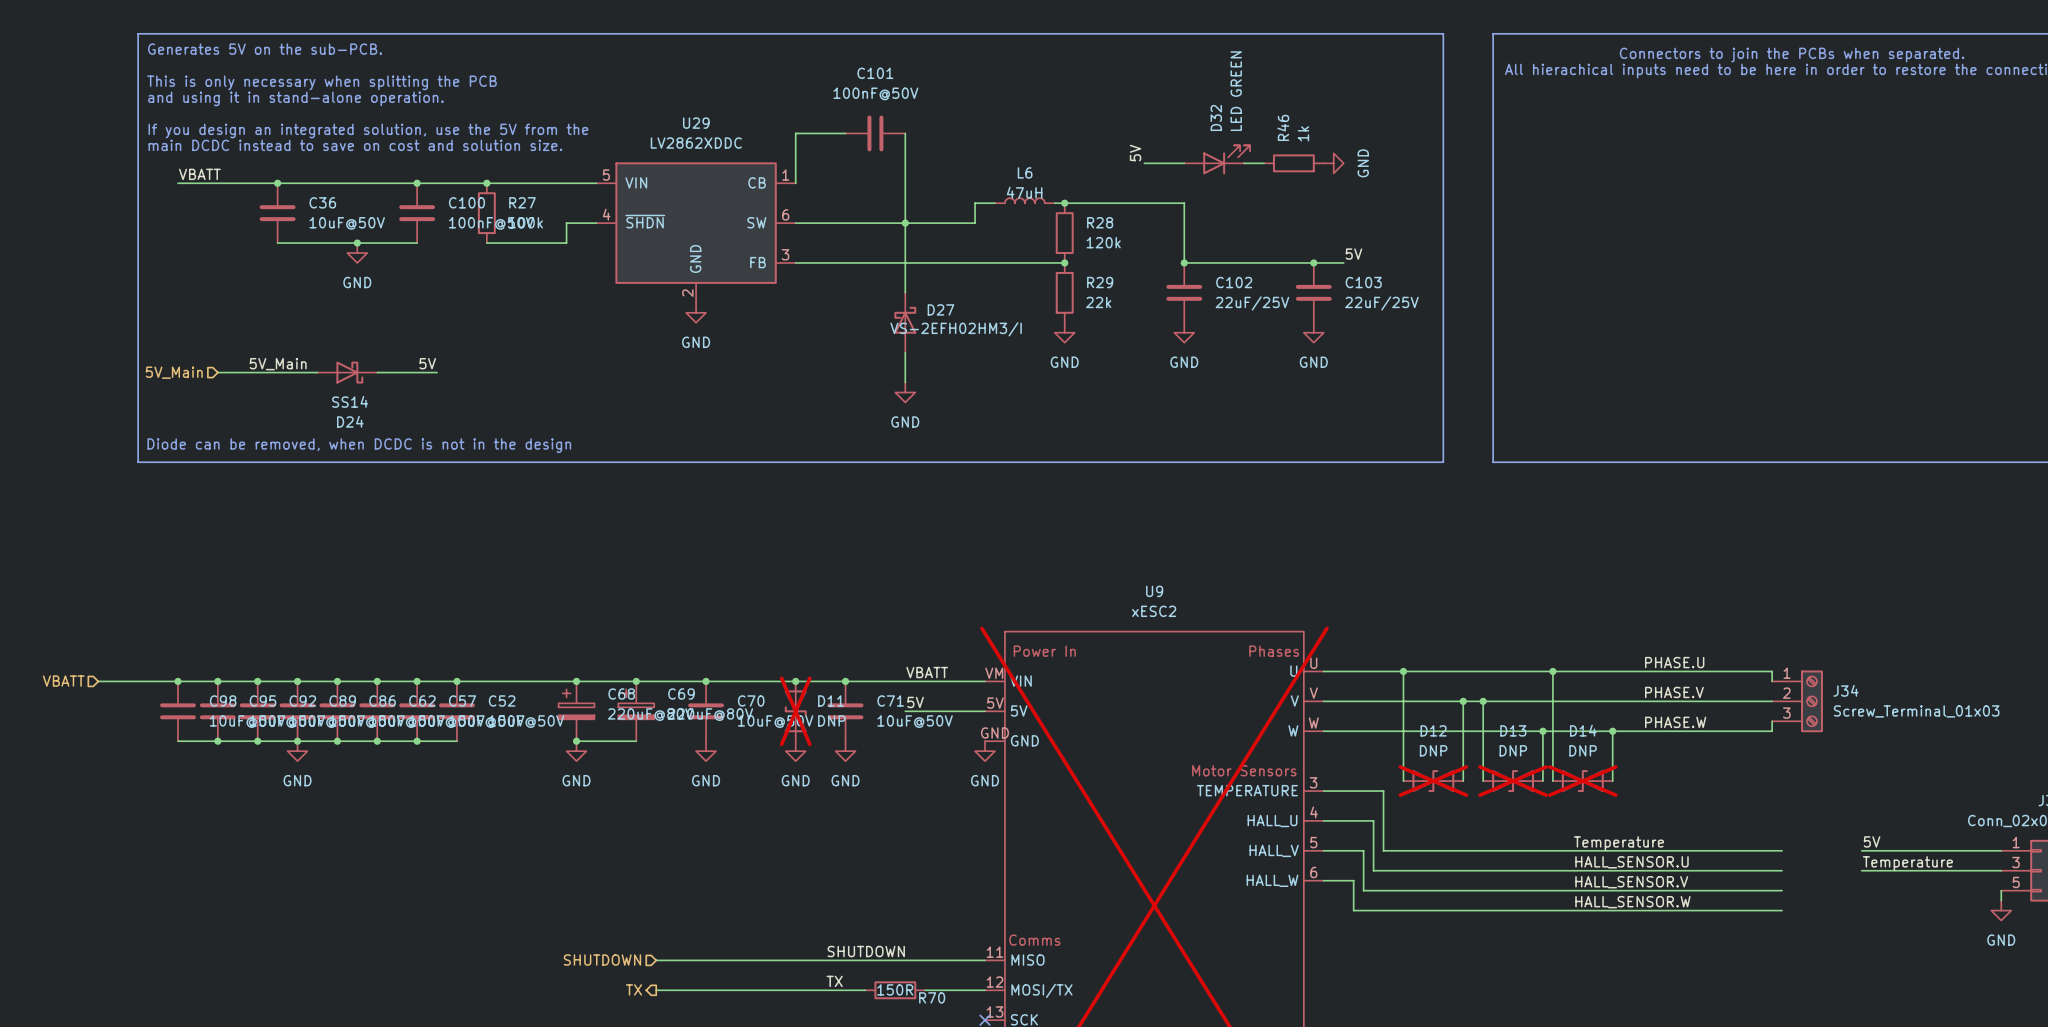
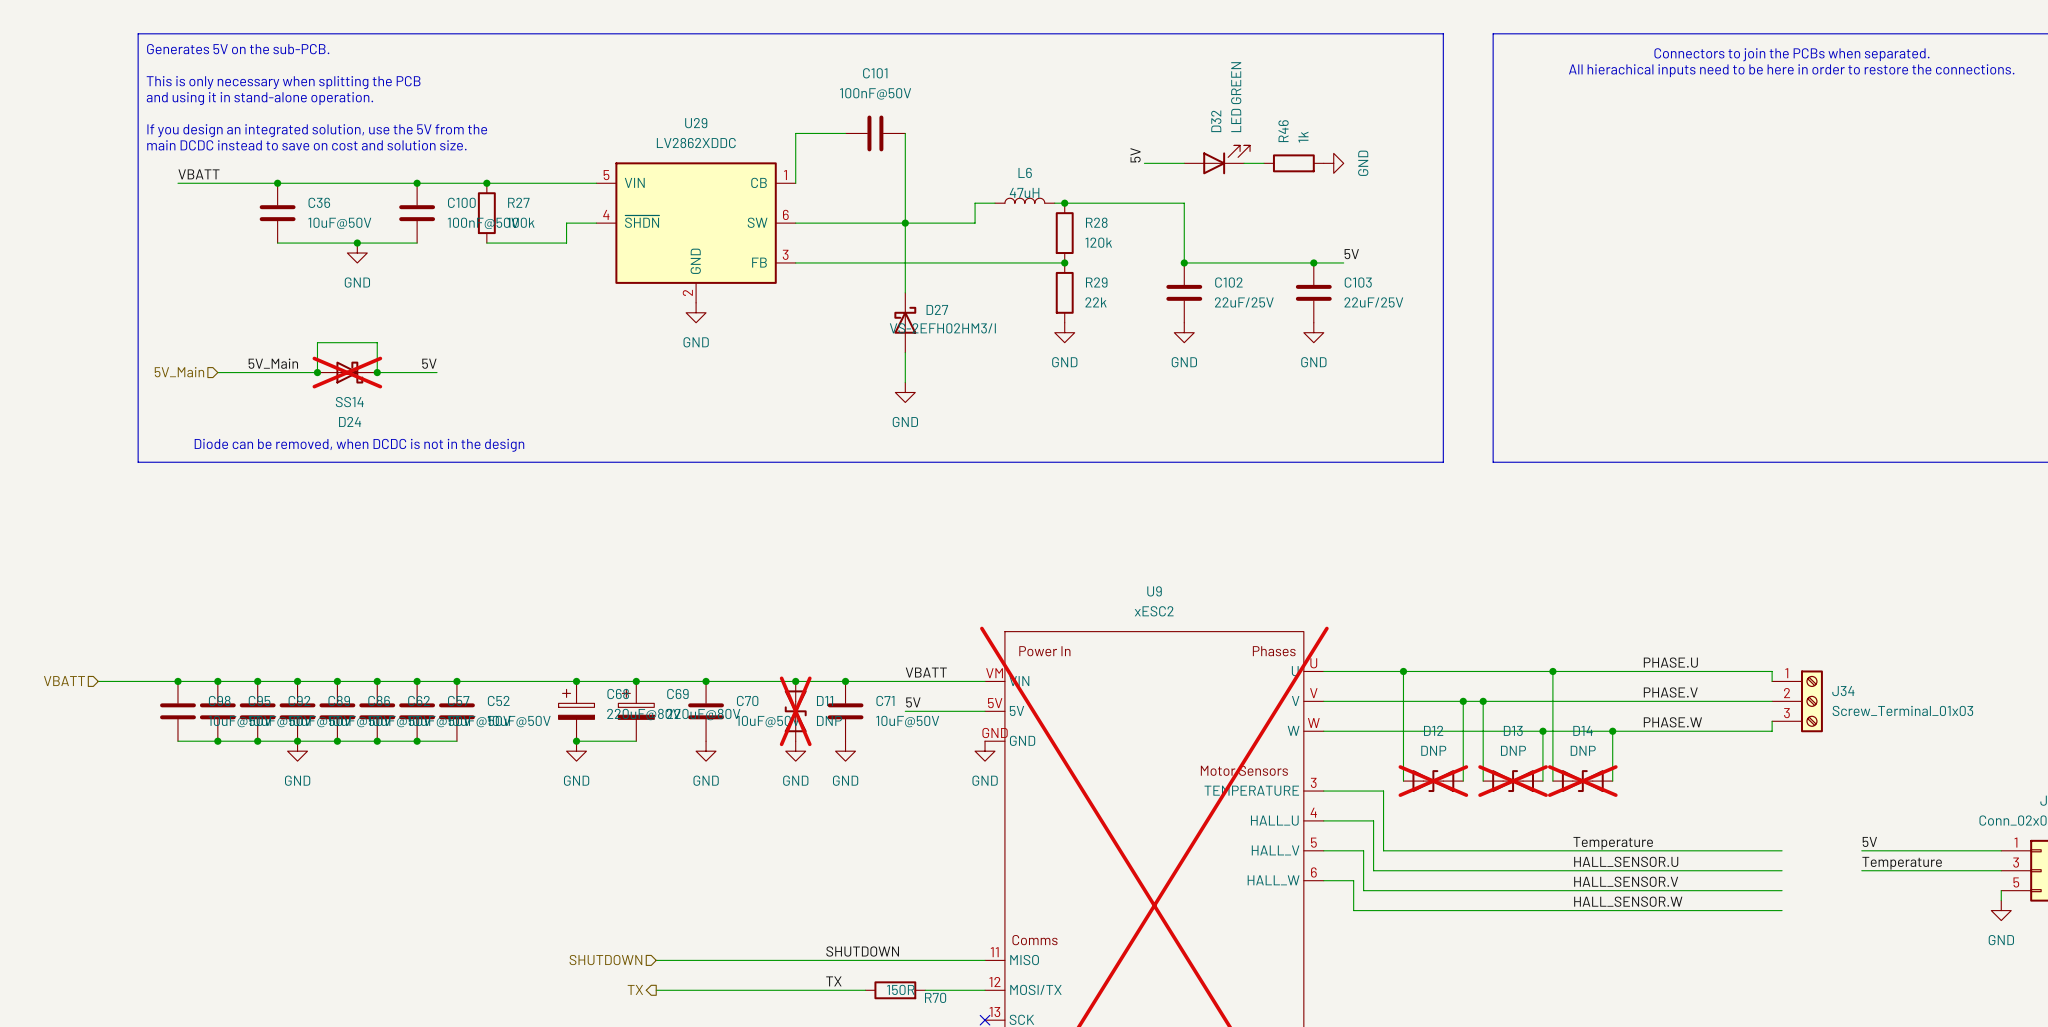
wire: none -> (317, 372) (317, 342) (377, 342) (377, 372)
junction: none -> (317, 372)
D24 do-not-place cross: none -> (347, 372)
junction: none -> (377, 372)

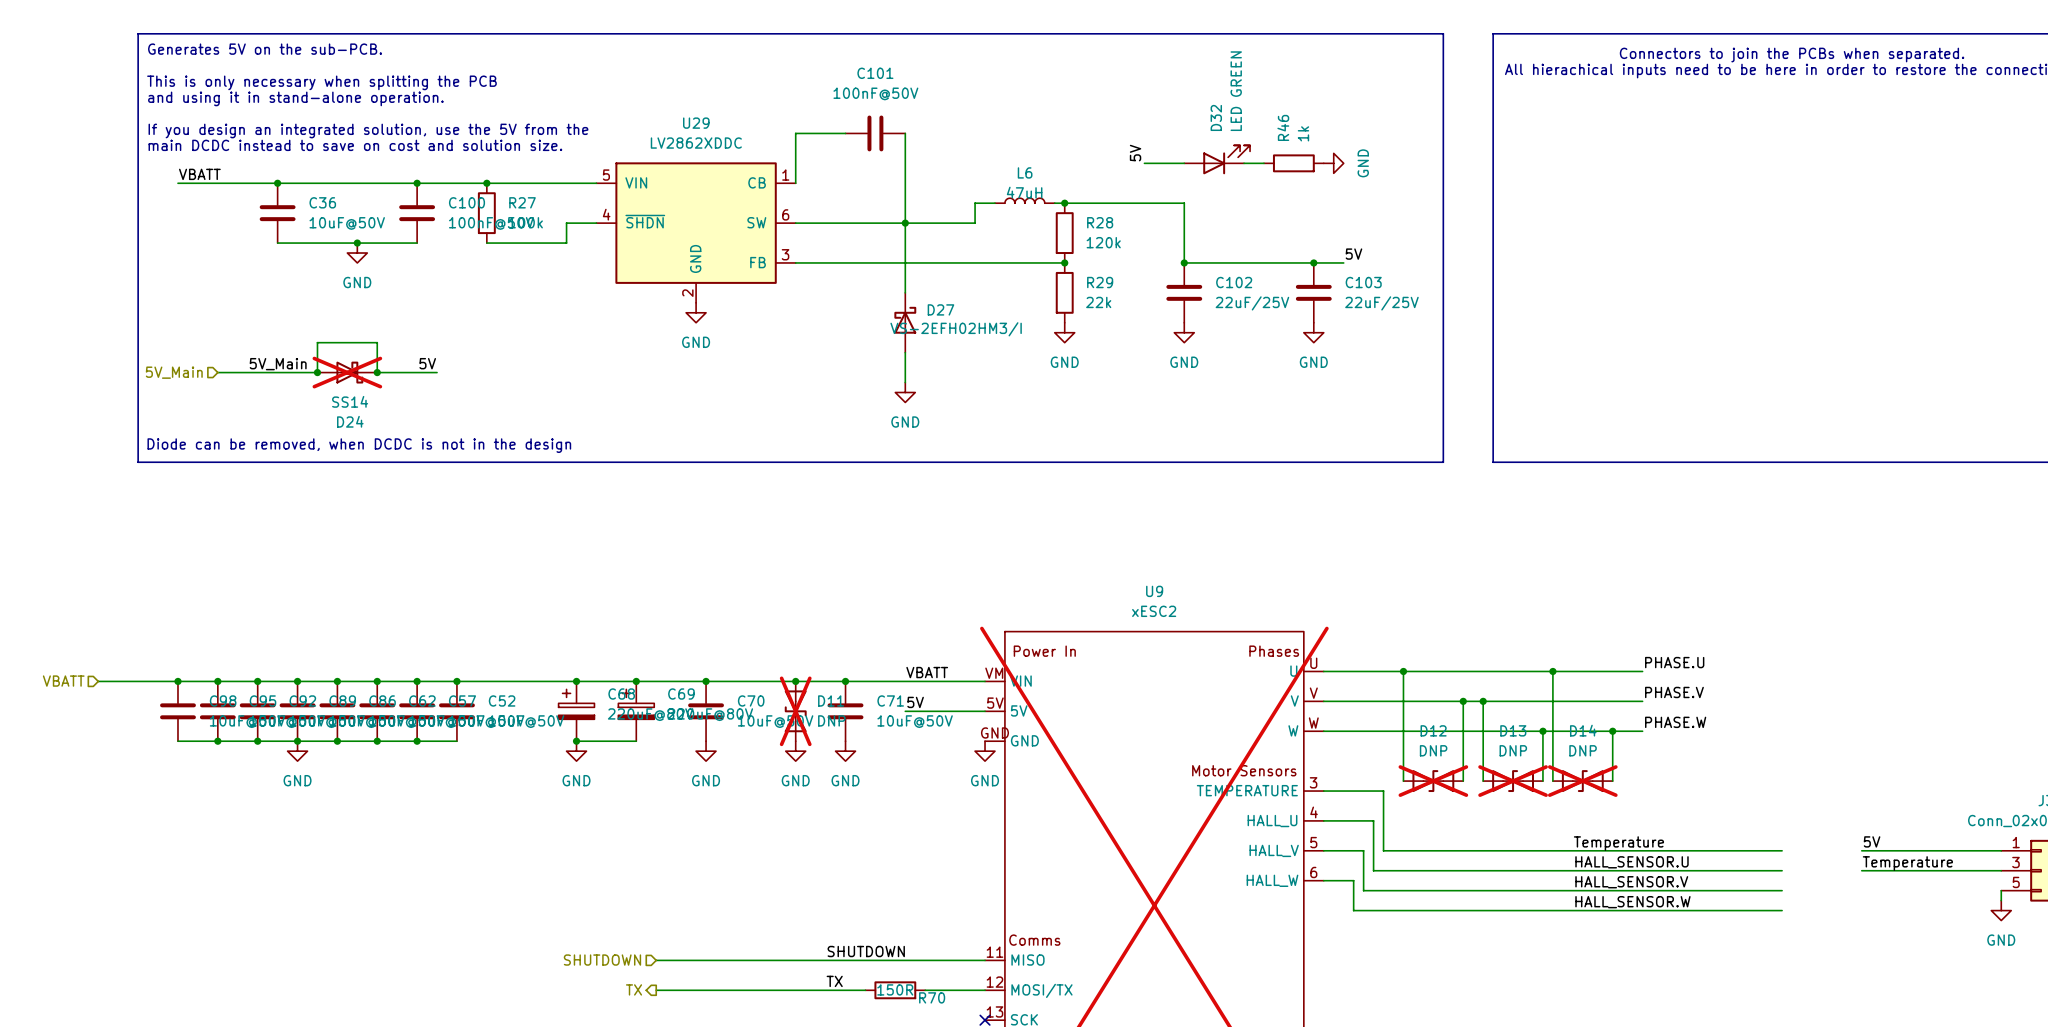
wire: (1642, 671) (1772, 671) (1772, 681) -> none
wire: (1642, 701) (1772, 701) -> none
J34: Screw_Terminal_01x03 (1797, 701) -> none
wire: (1772, 721) (1772, 731) (1642, 731) -> none

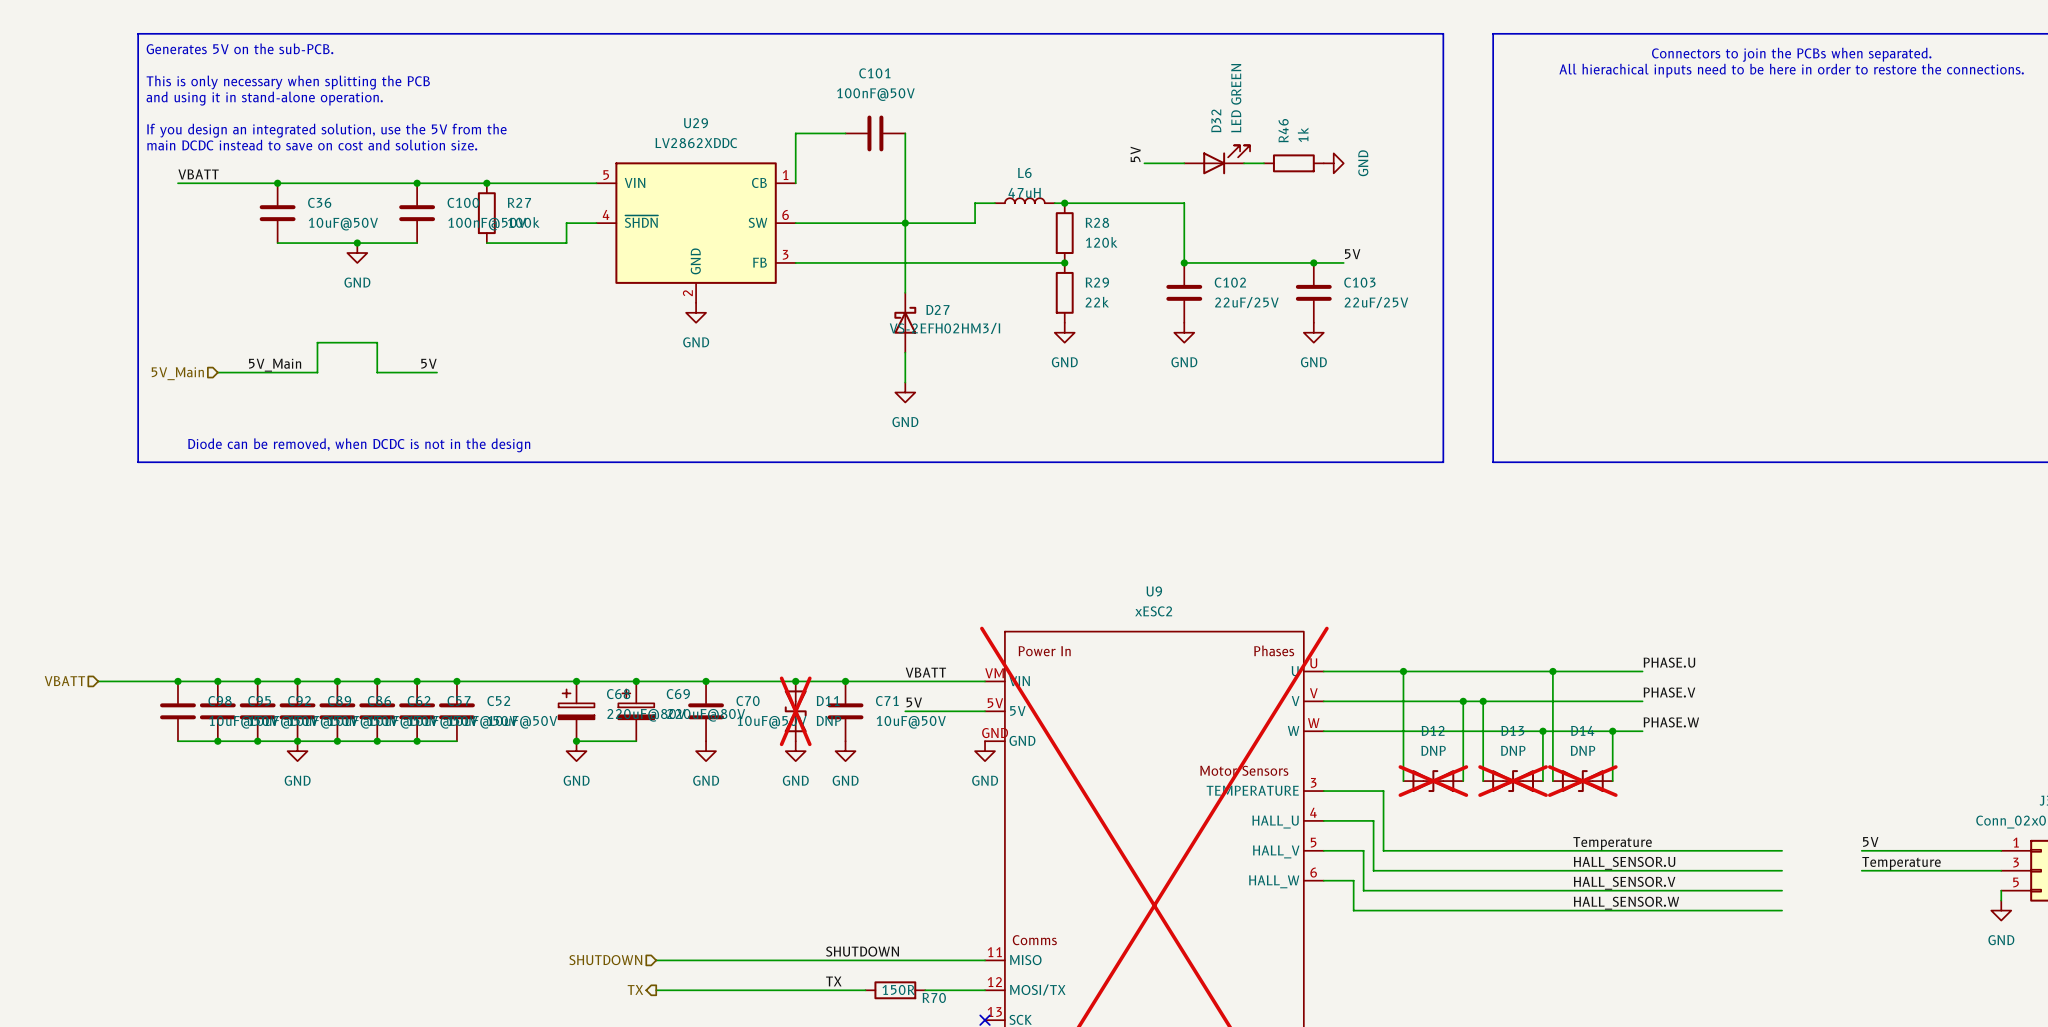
junction: (317, 372) -> none
D24: SS14 (347, 372) -> none
junction: (377, 372) -> none

